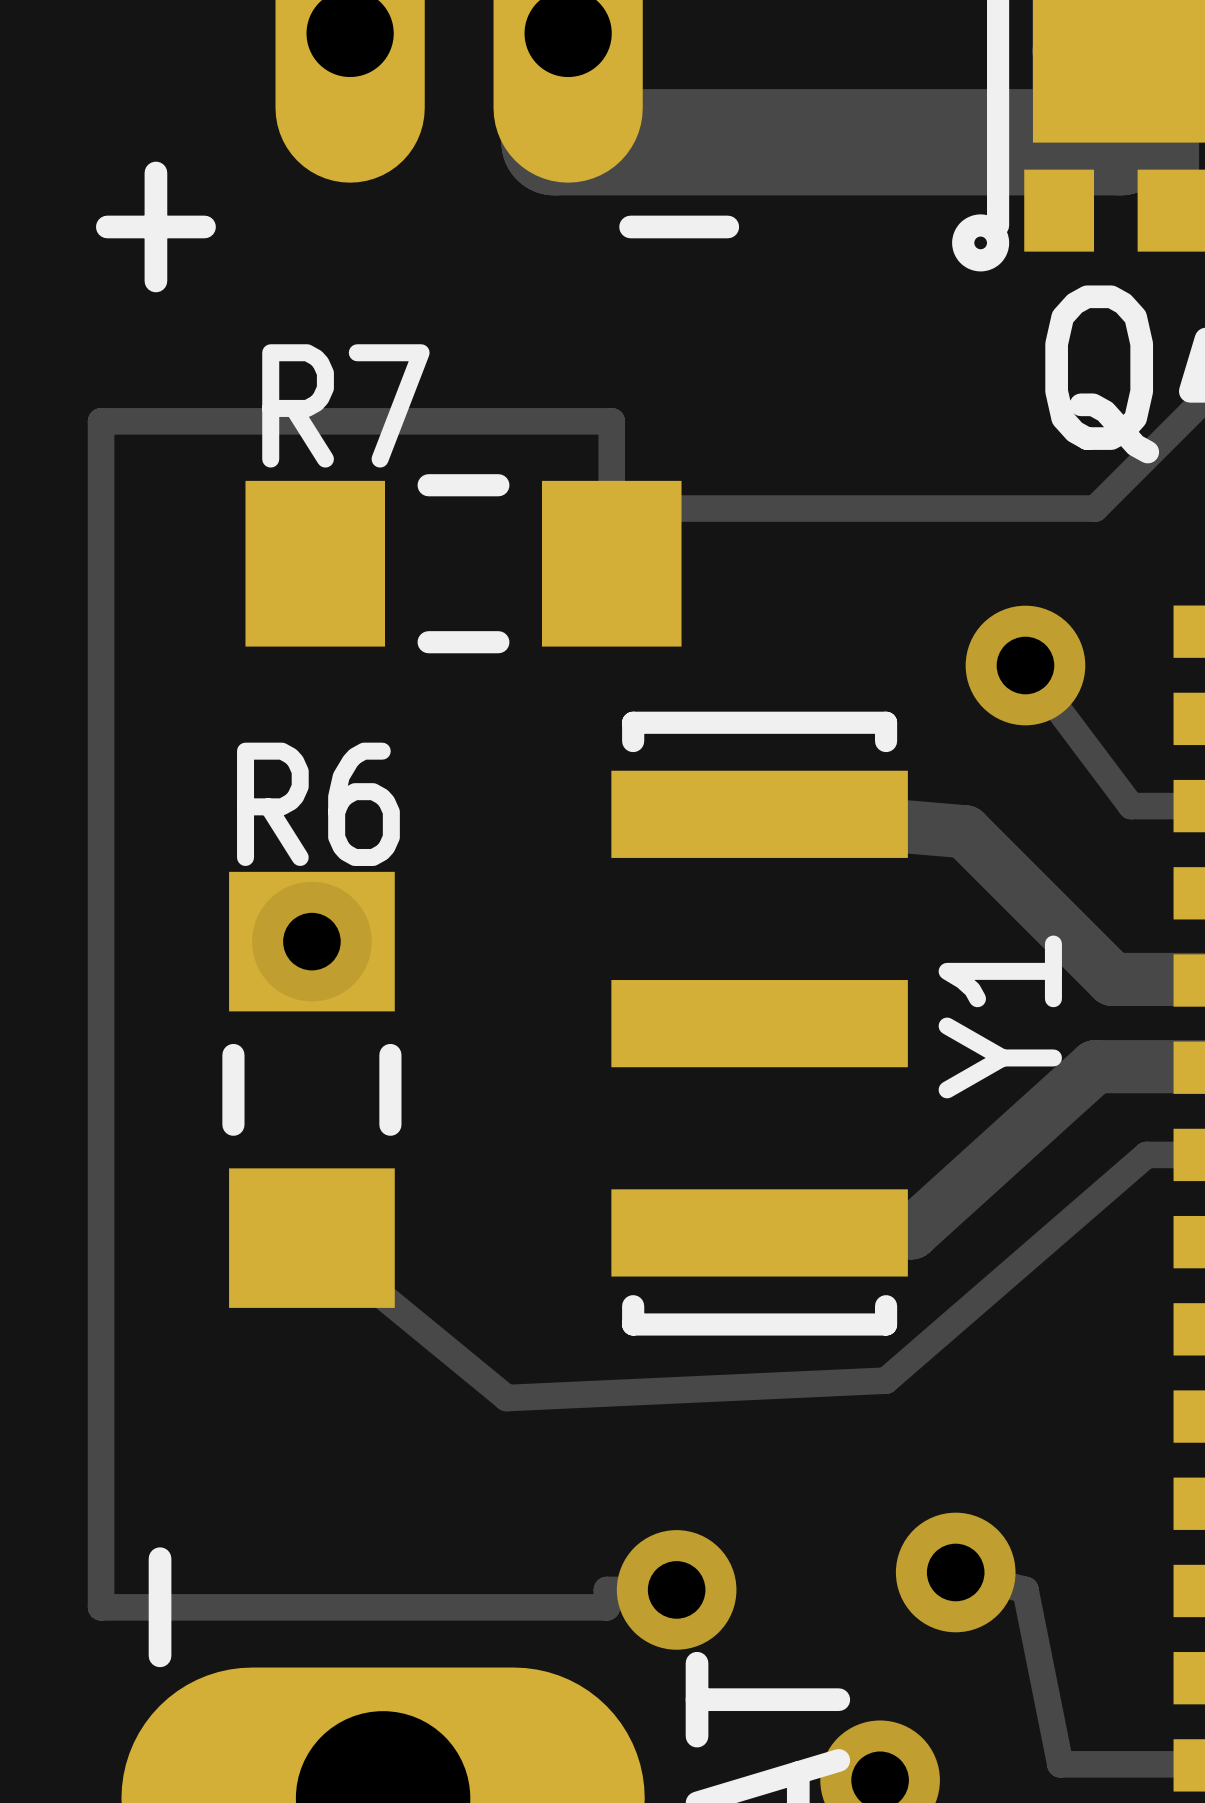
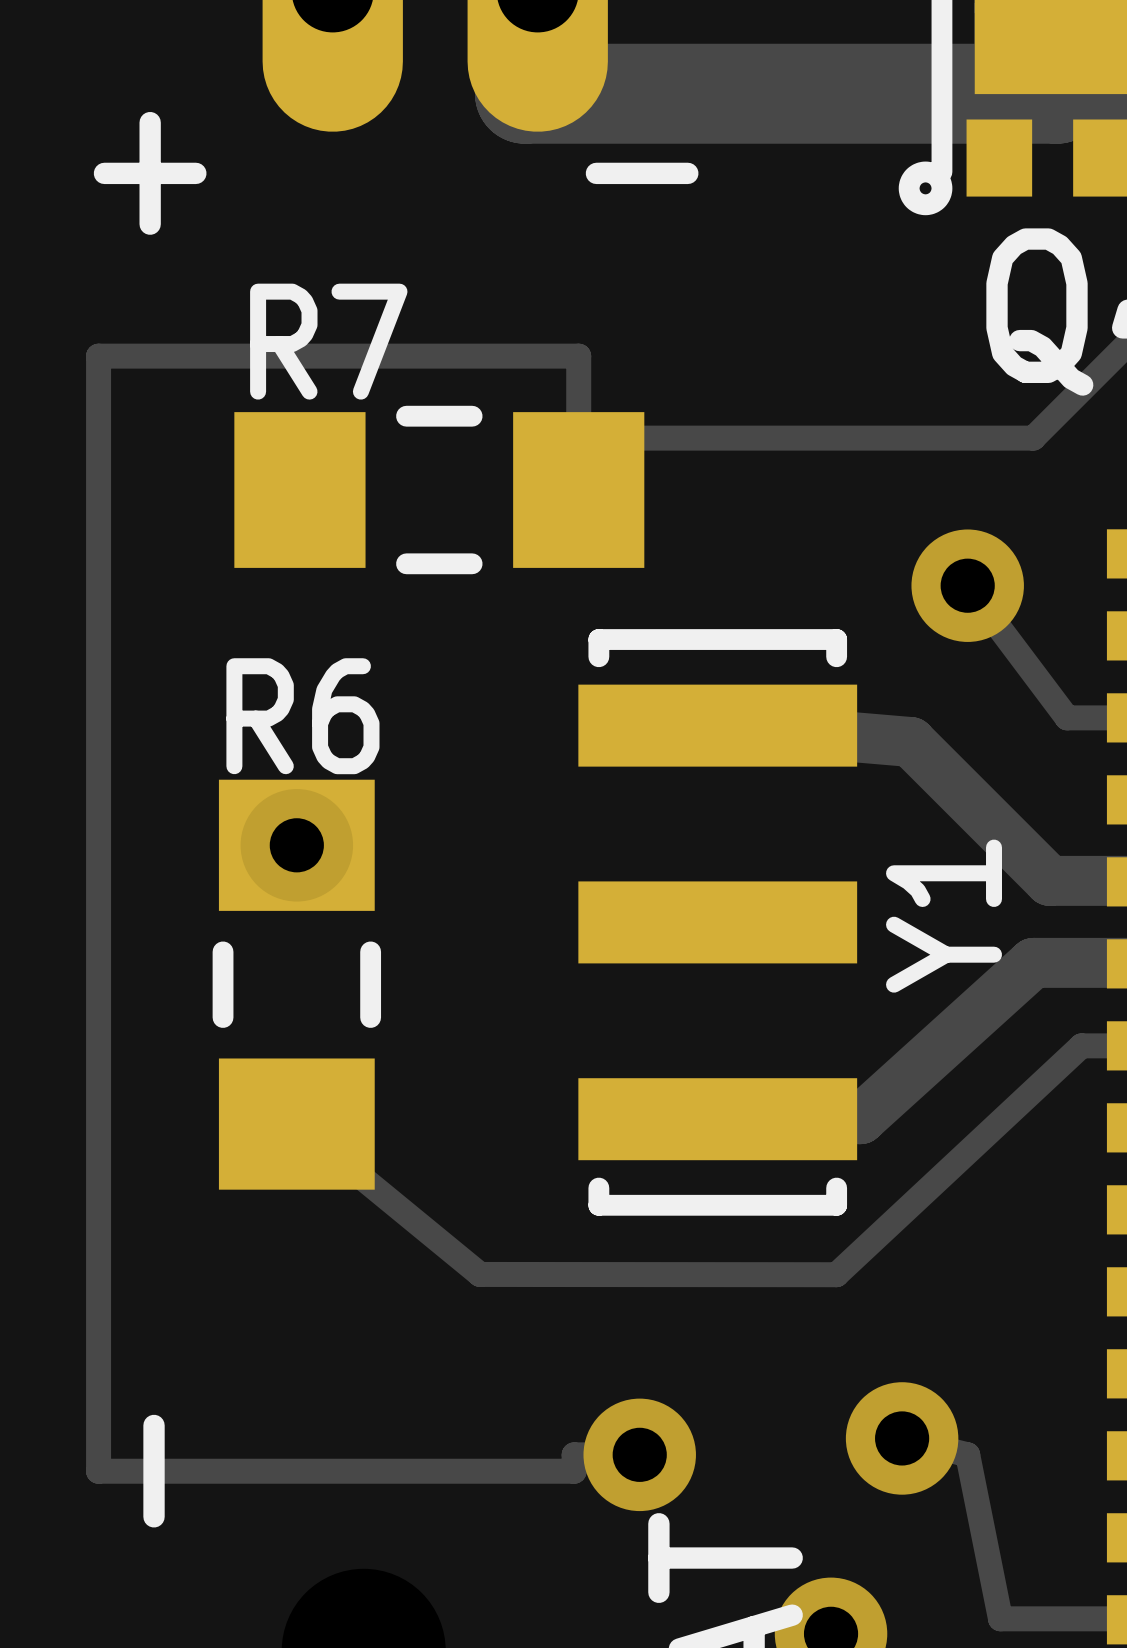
track: (1146, 1154) (885, 1380) (506, 1398) -> (1081, 1045) (836, 1274) (480, 1274)

